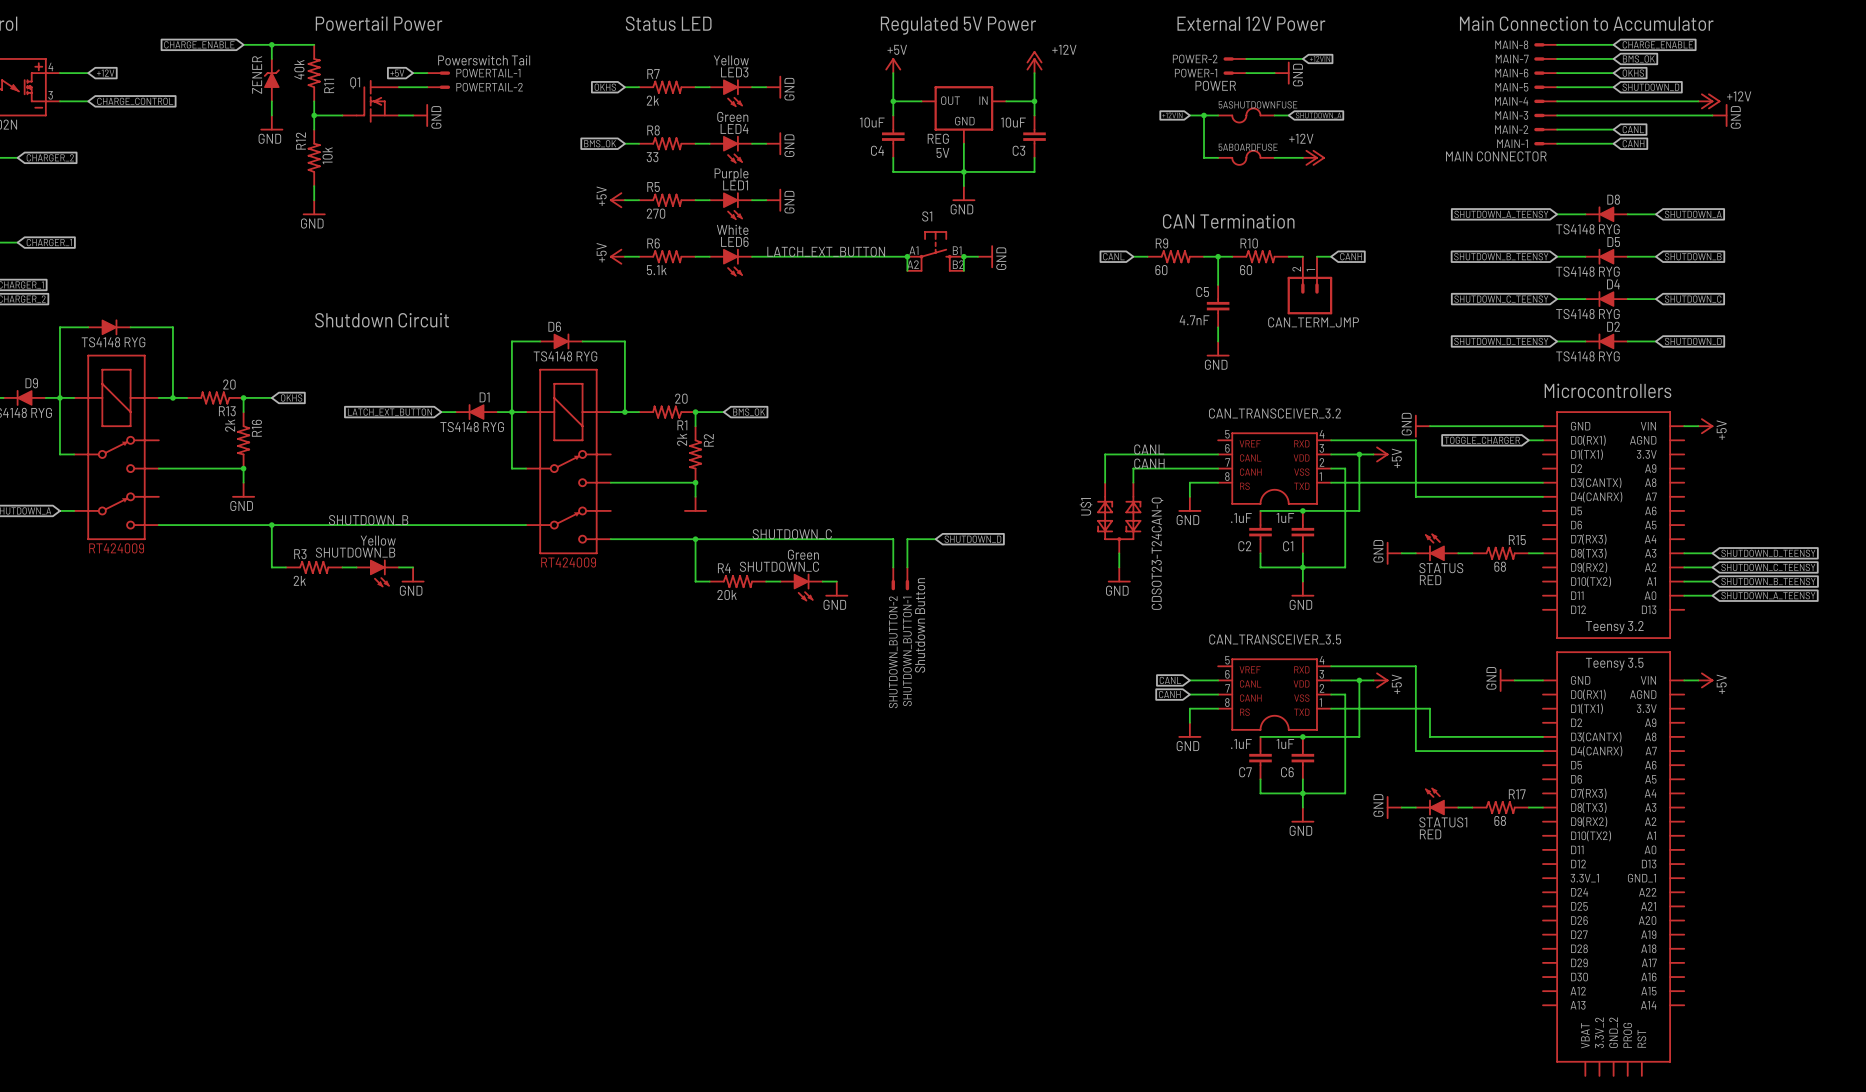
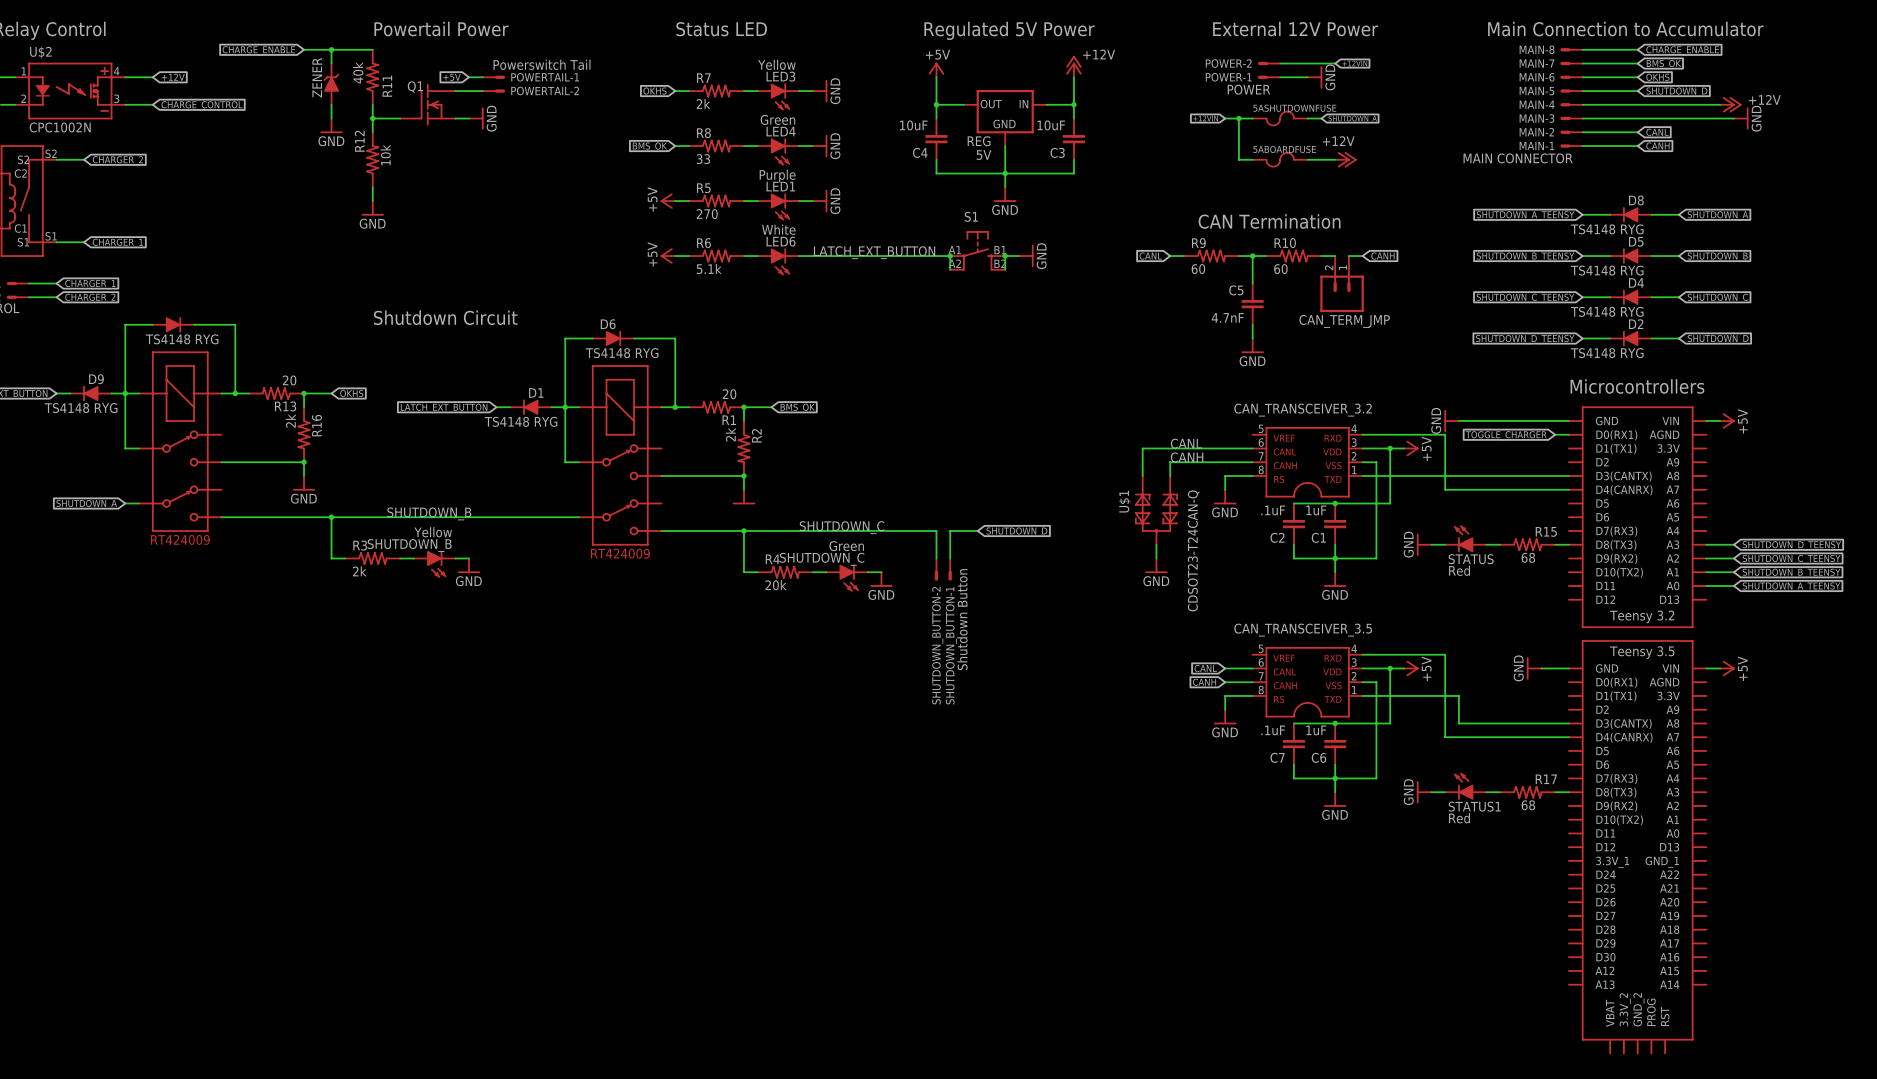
STATUS value: RED (1430, 580) -> Red (1459, 570)
STATUS1 value: RED (1430, 834) -> Red (1459, 818)

